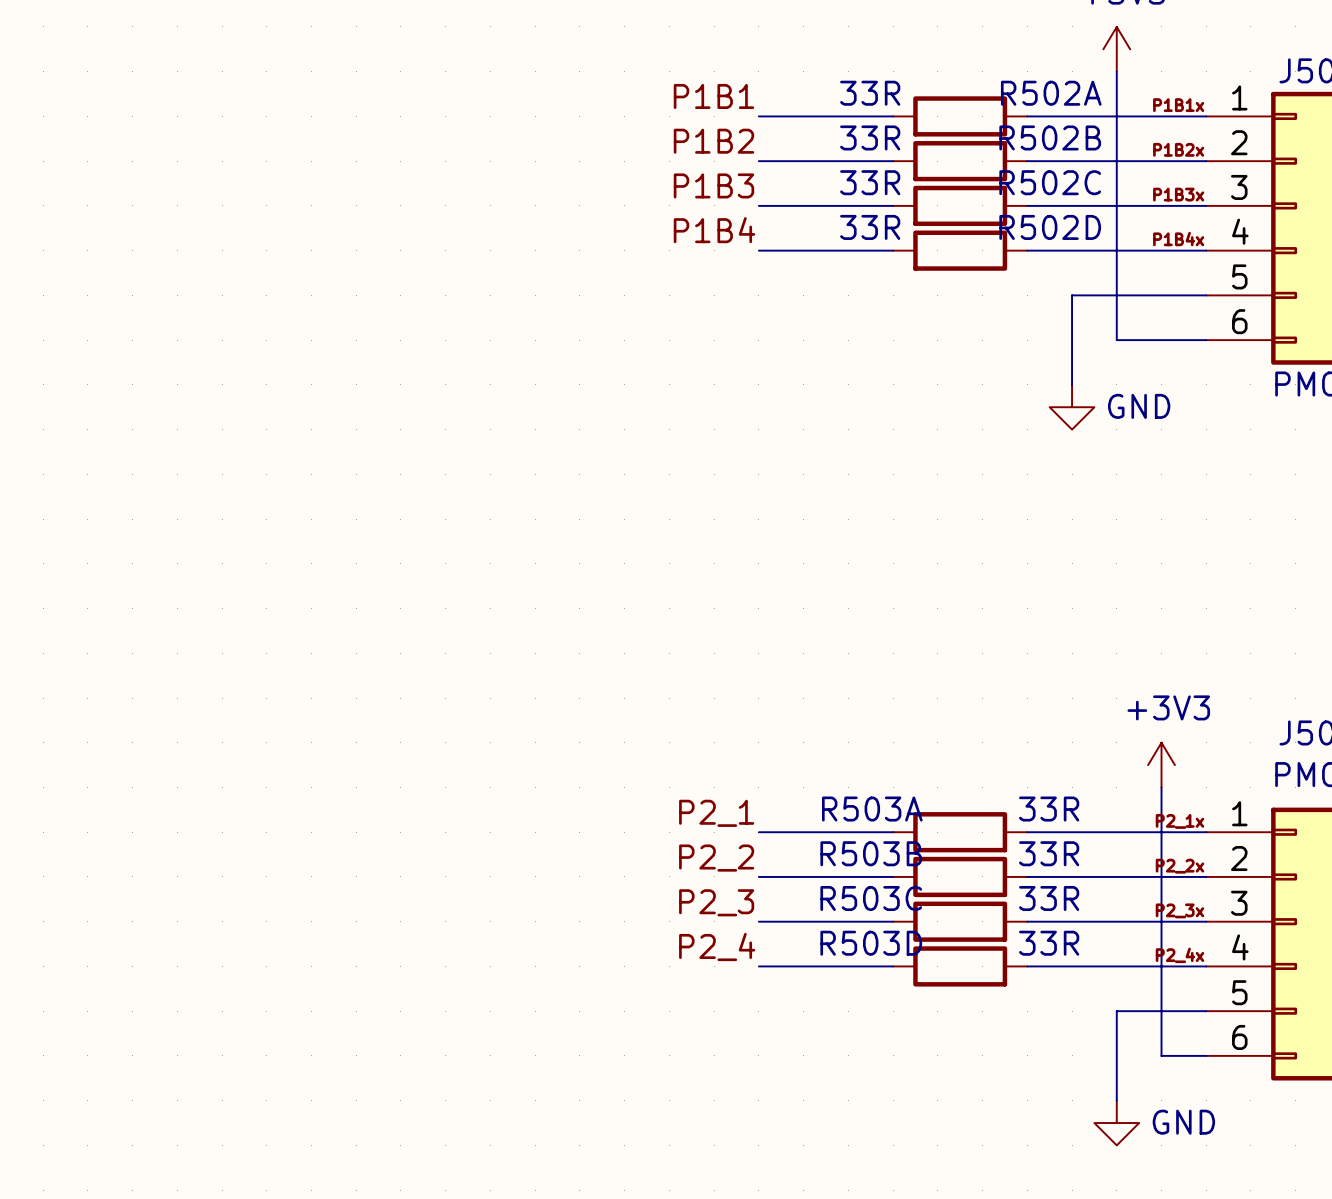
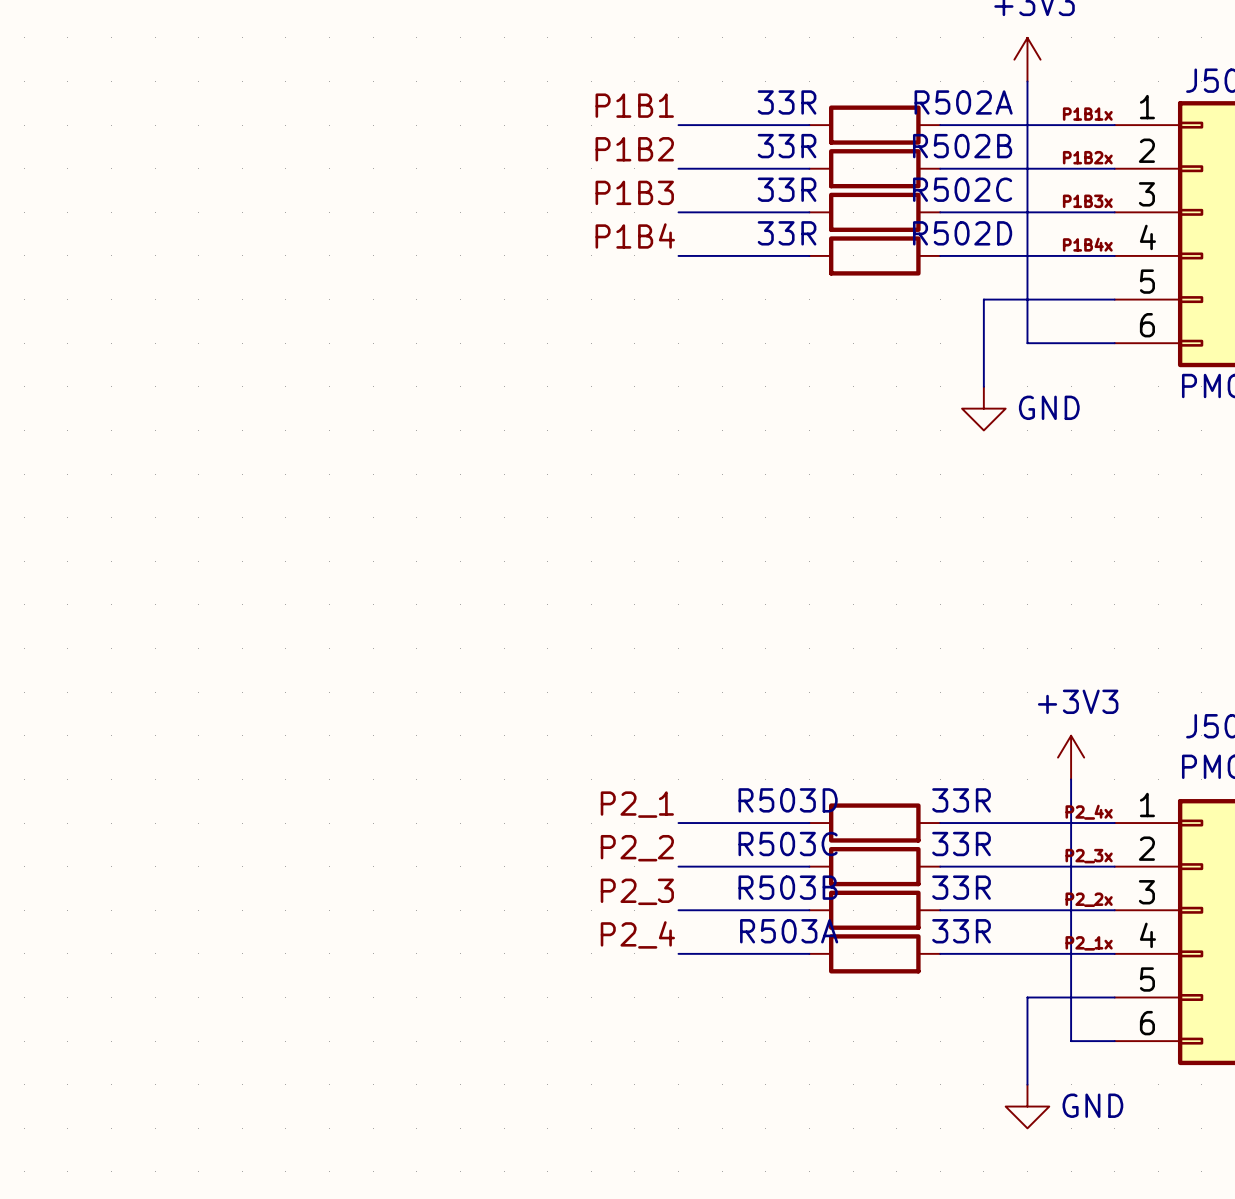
R503A name: R503A (872, 809) -> R503D (788, 800)
label: P2_1x (1179, 821) -> P2_4x (1089, 812)
R503B name: R503B (871, 853) -> R503C (788, 844)
label: P2_2x (1179, 866) -> P2_3x (1089, 856)
R503C name: R503C (871, 898) -> R503B (788, 887)
label: P2_3x (1179, 910) -> P2_2x (1089, 899)
R503D name: R503D (871, 943) -> R503A (789, 931)
label: P2_4x (1179, 955) -> P2_1x (1089, 943)

